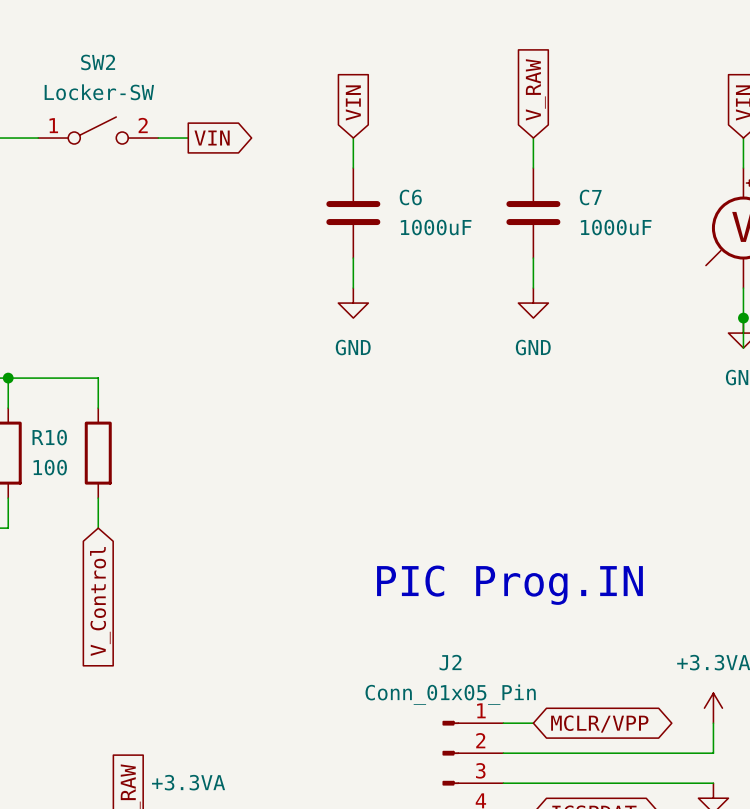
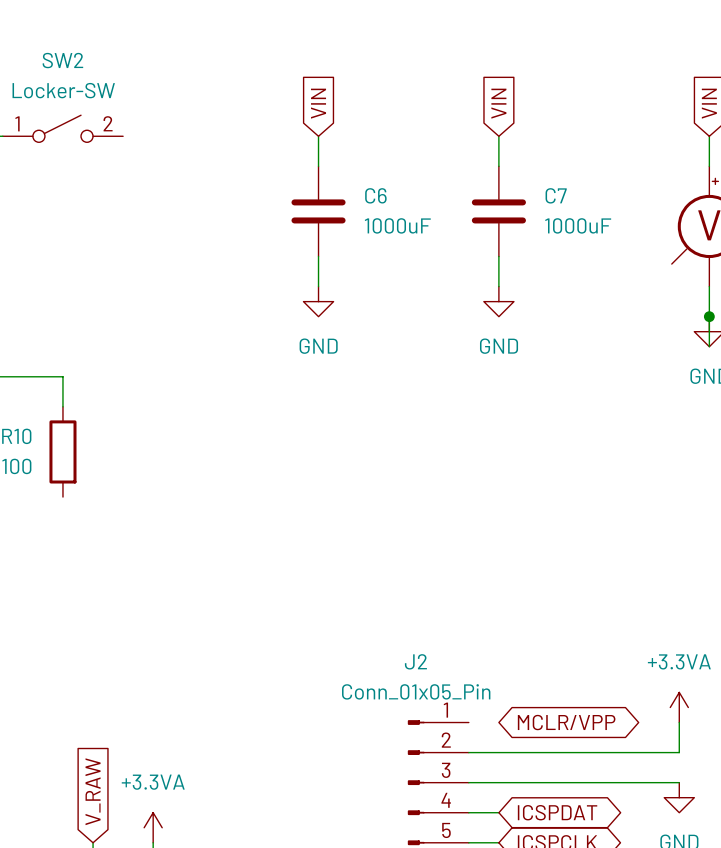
global label: V_RAW (535, 89) -> VIN (498, 103)
wire: (158, 138) (188, 138) -> none
global label: VIN (212, 138) -> none
wire: (98, 498) (98, 528) -> none
text: PIC Prog.IN (509, 585) -> none
global label: V_Control (100, 601) -> none
wire: (503, 723) (533, 723) -> none

